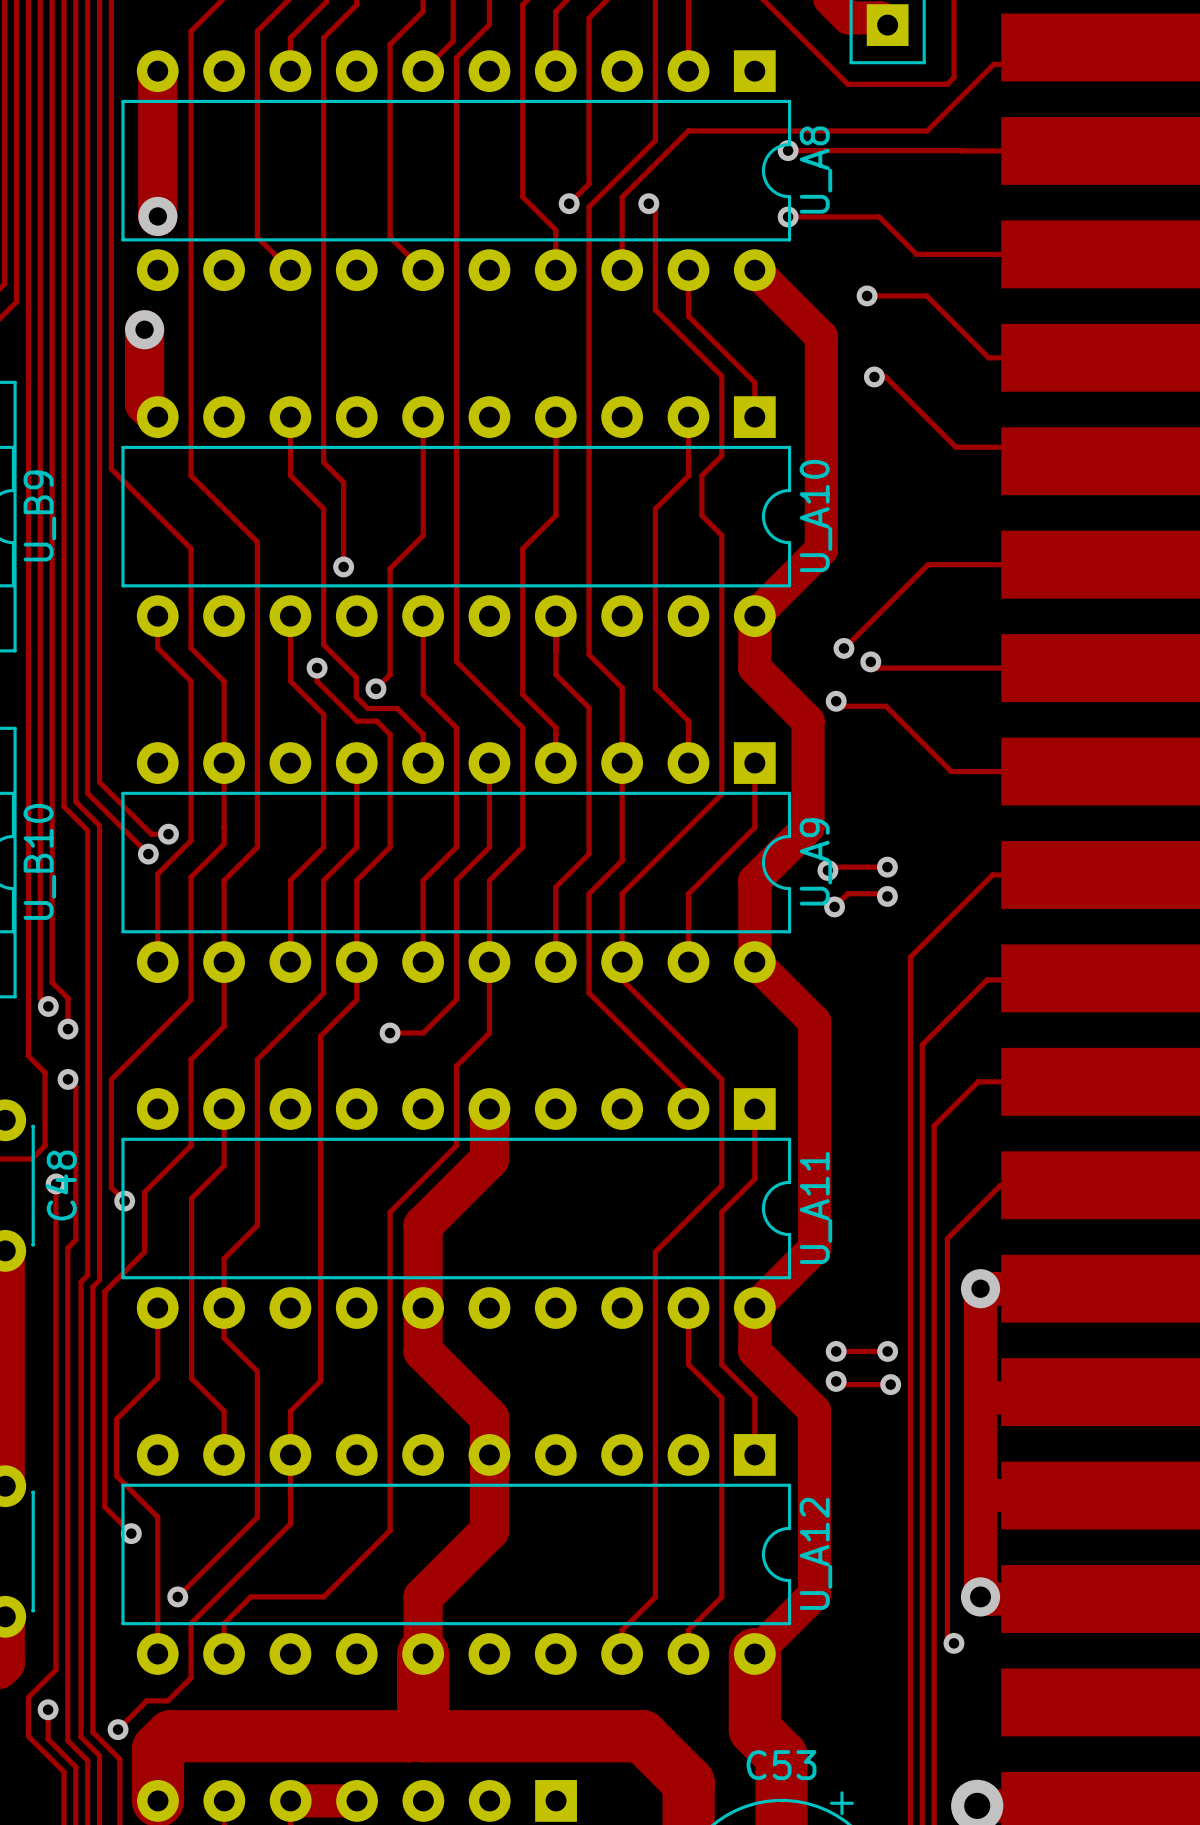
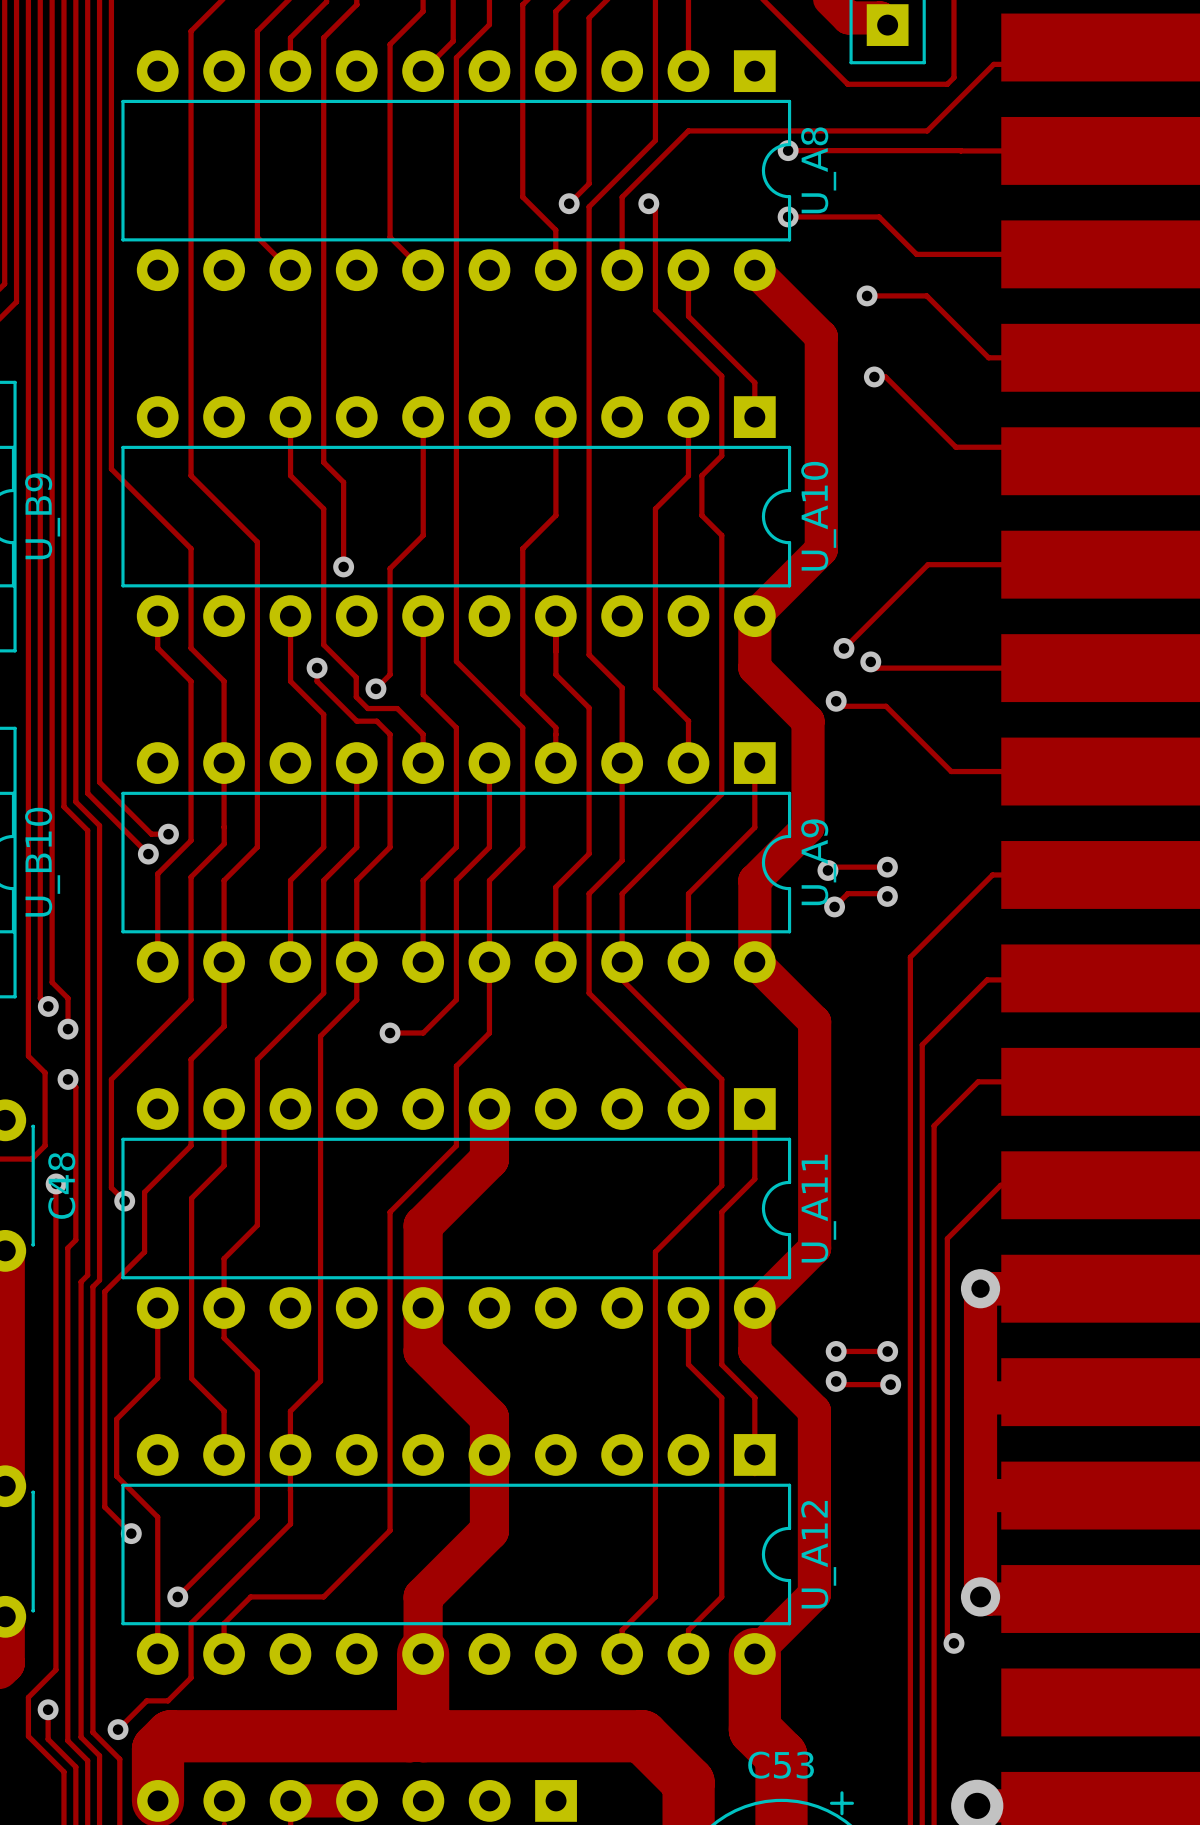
track: (157, 71) (157, 216) -> none
via: (157, 216) -> none
track: (144, 329) (144, 403) (157, 417) -> none
via: (144, 329) -> none

